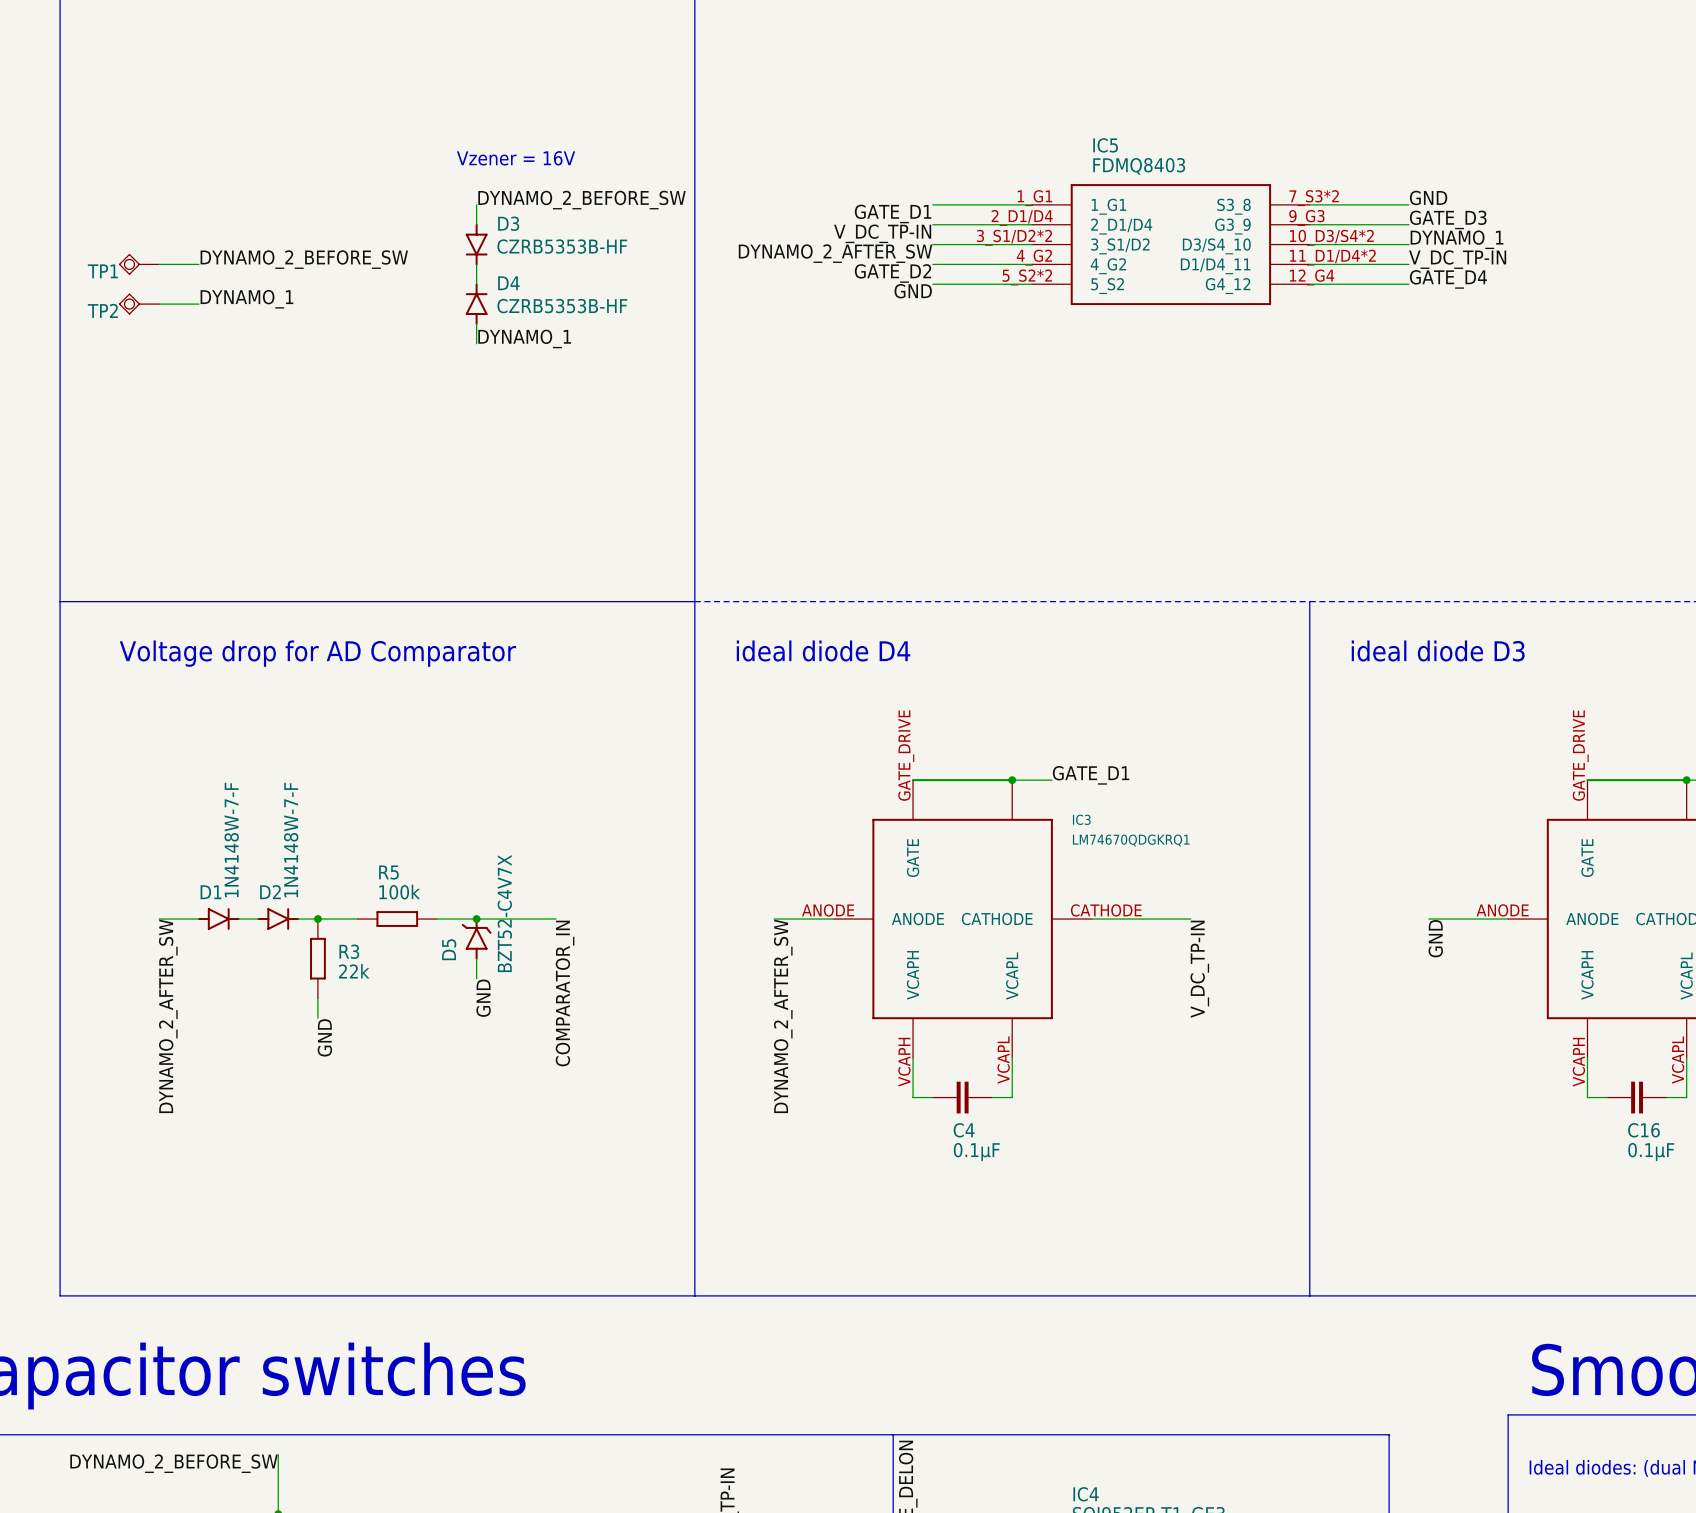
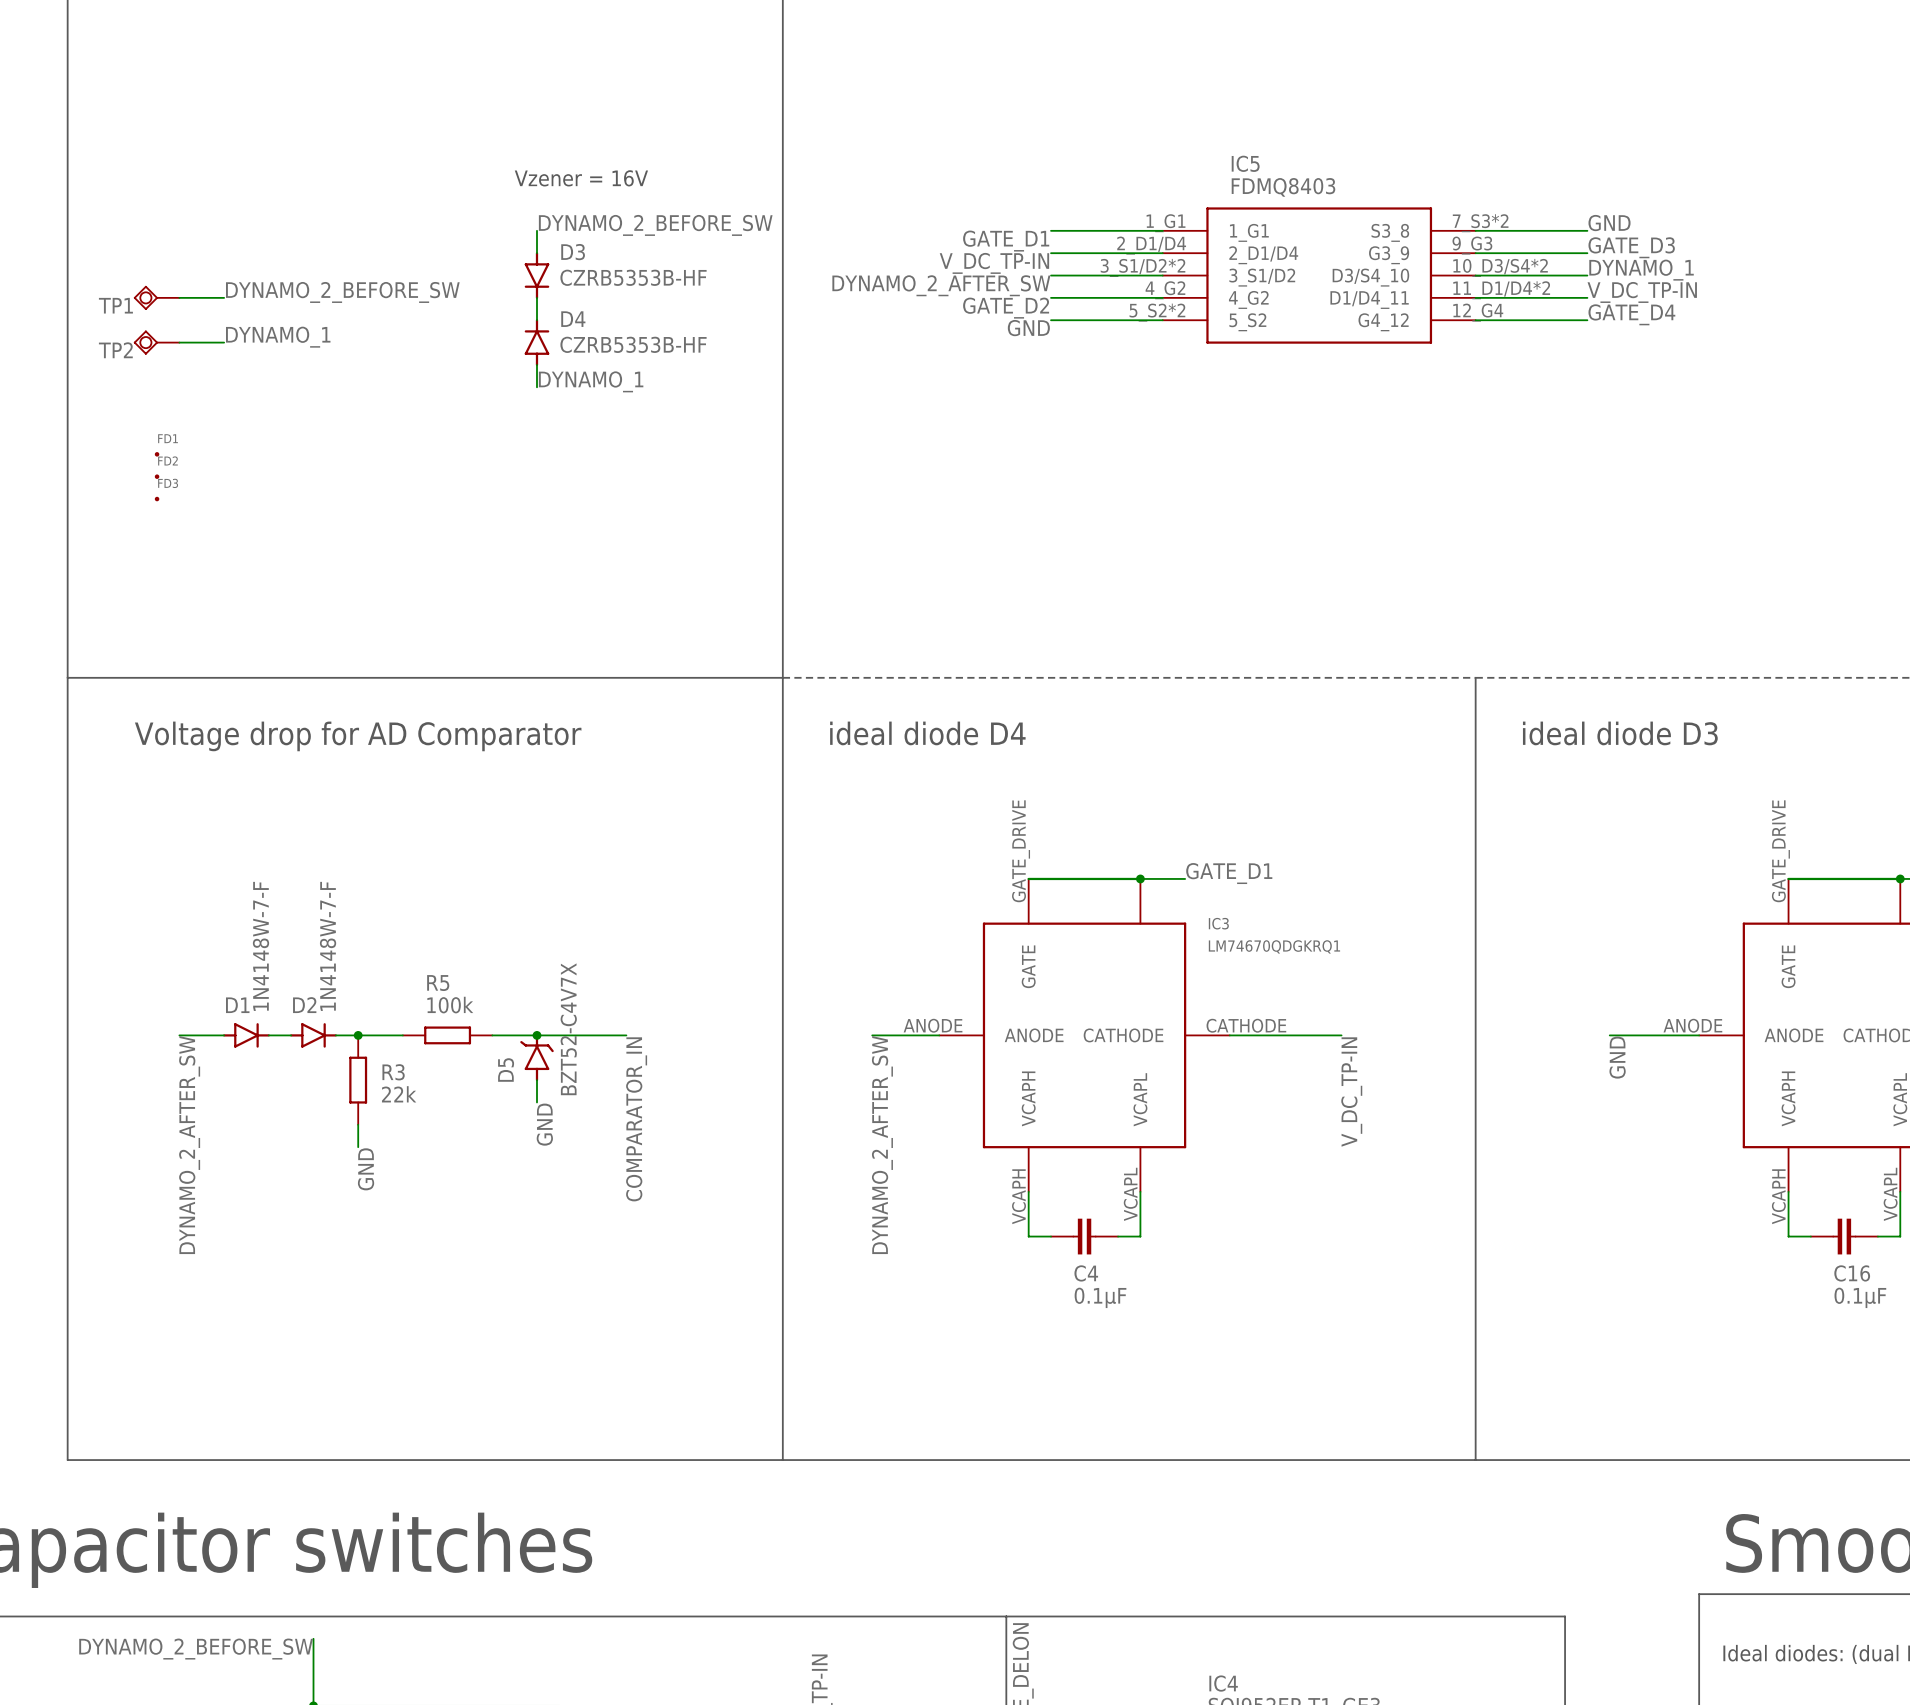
FD1: none -> (157, 454)
FD2: none -> (157, 476)
FD3: none -> (157, 499)

